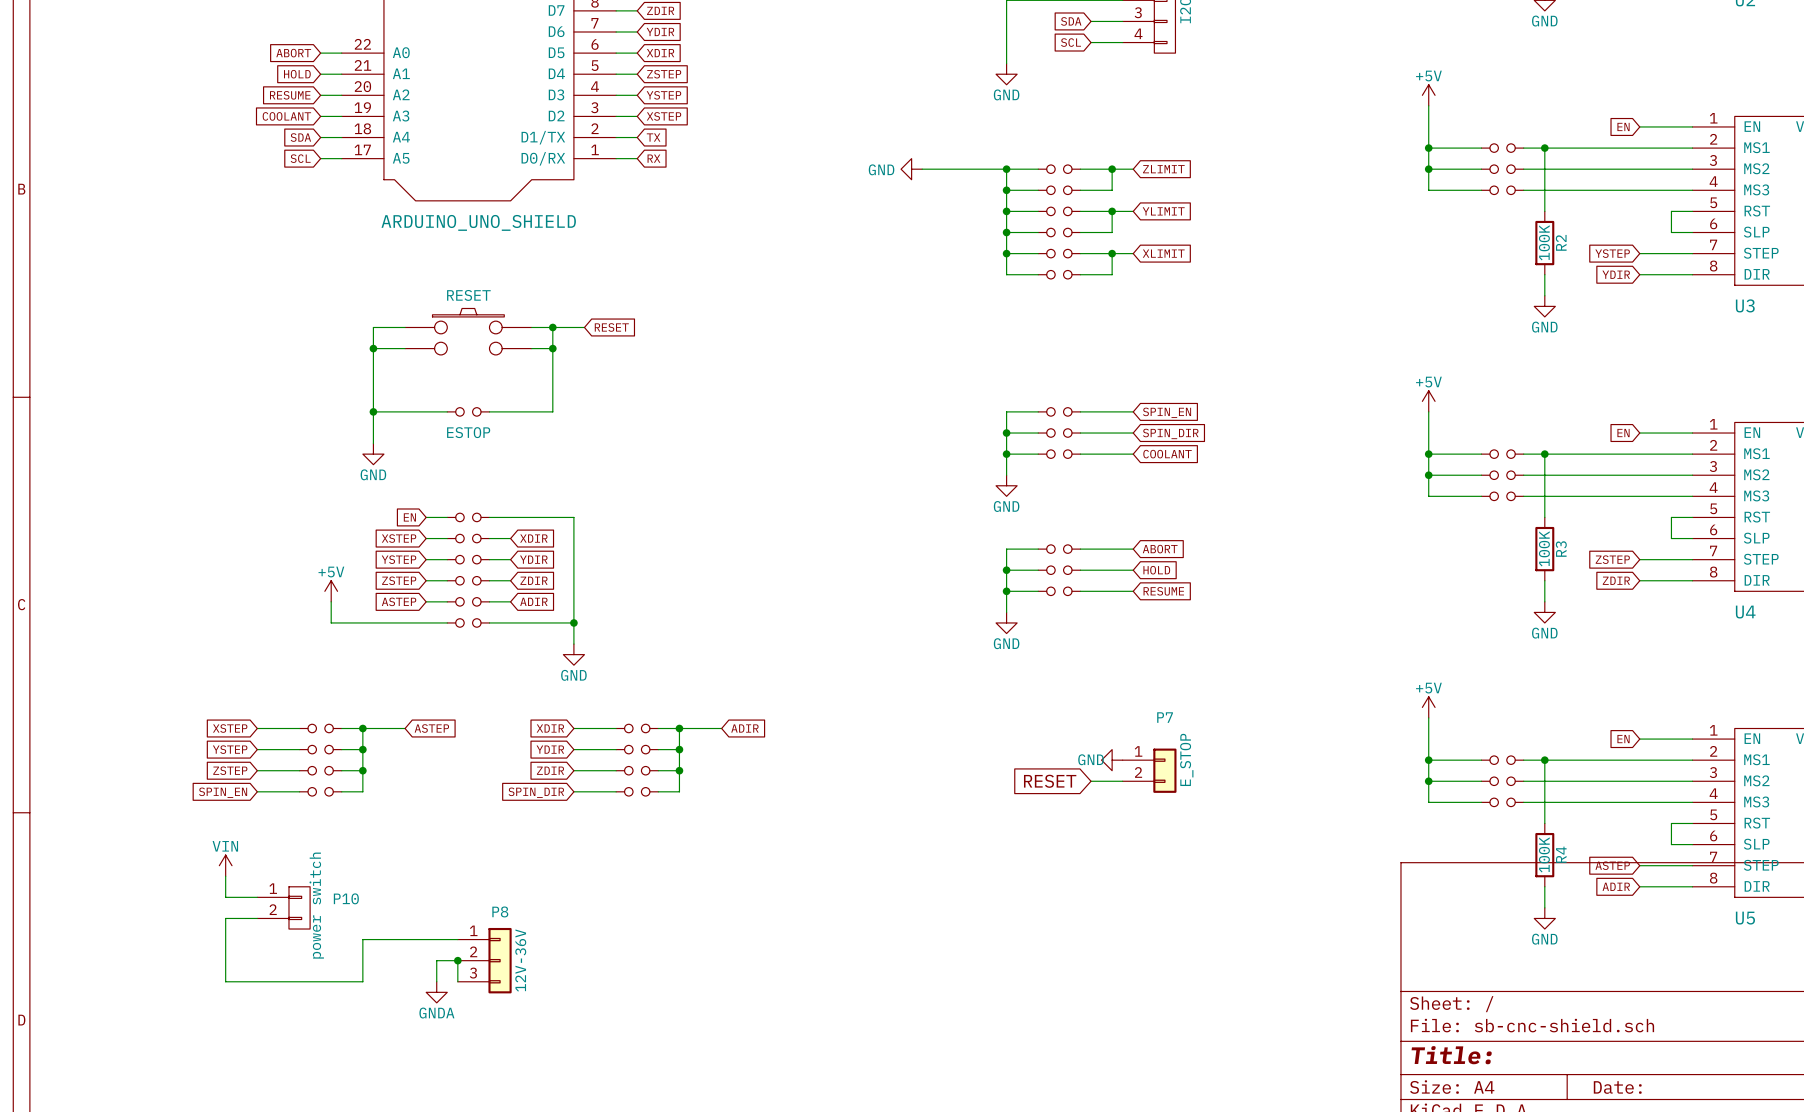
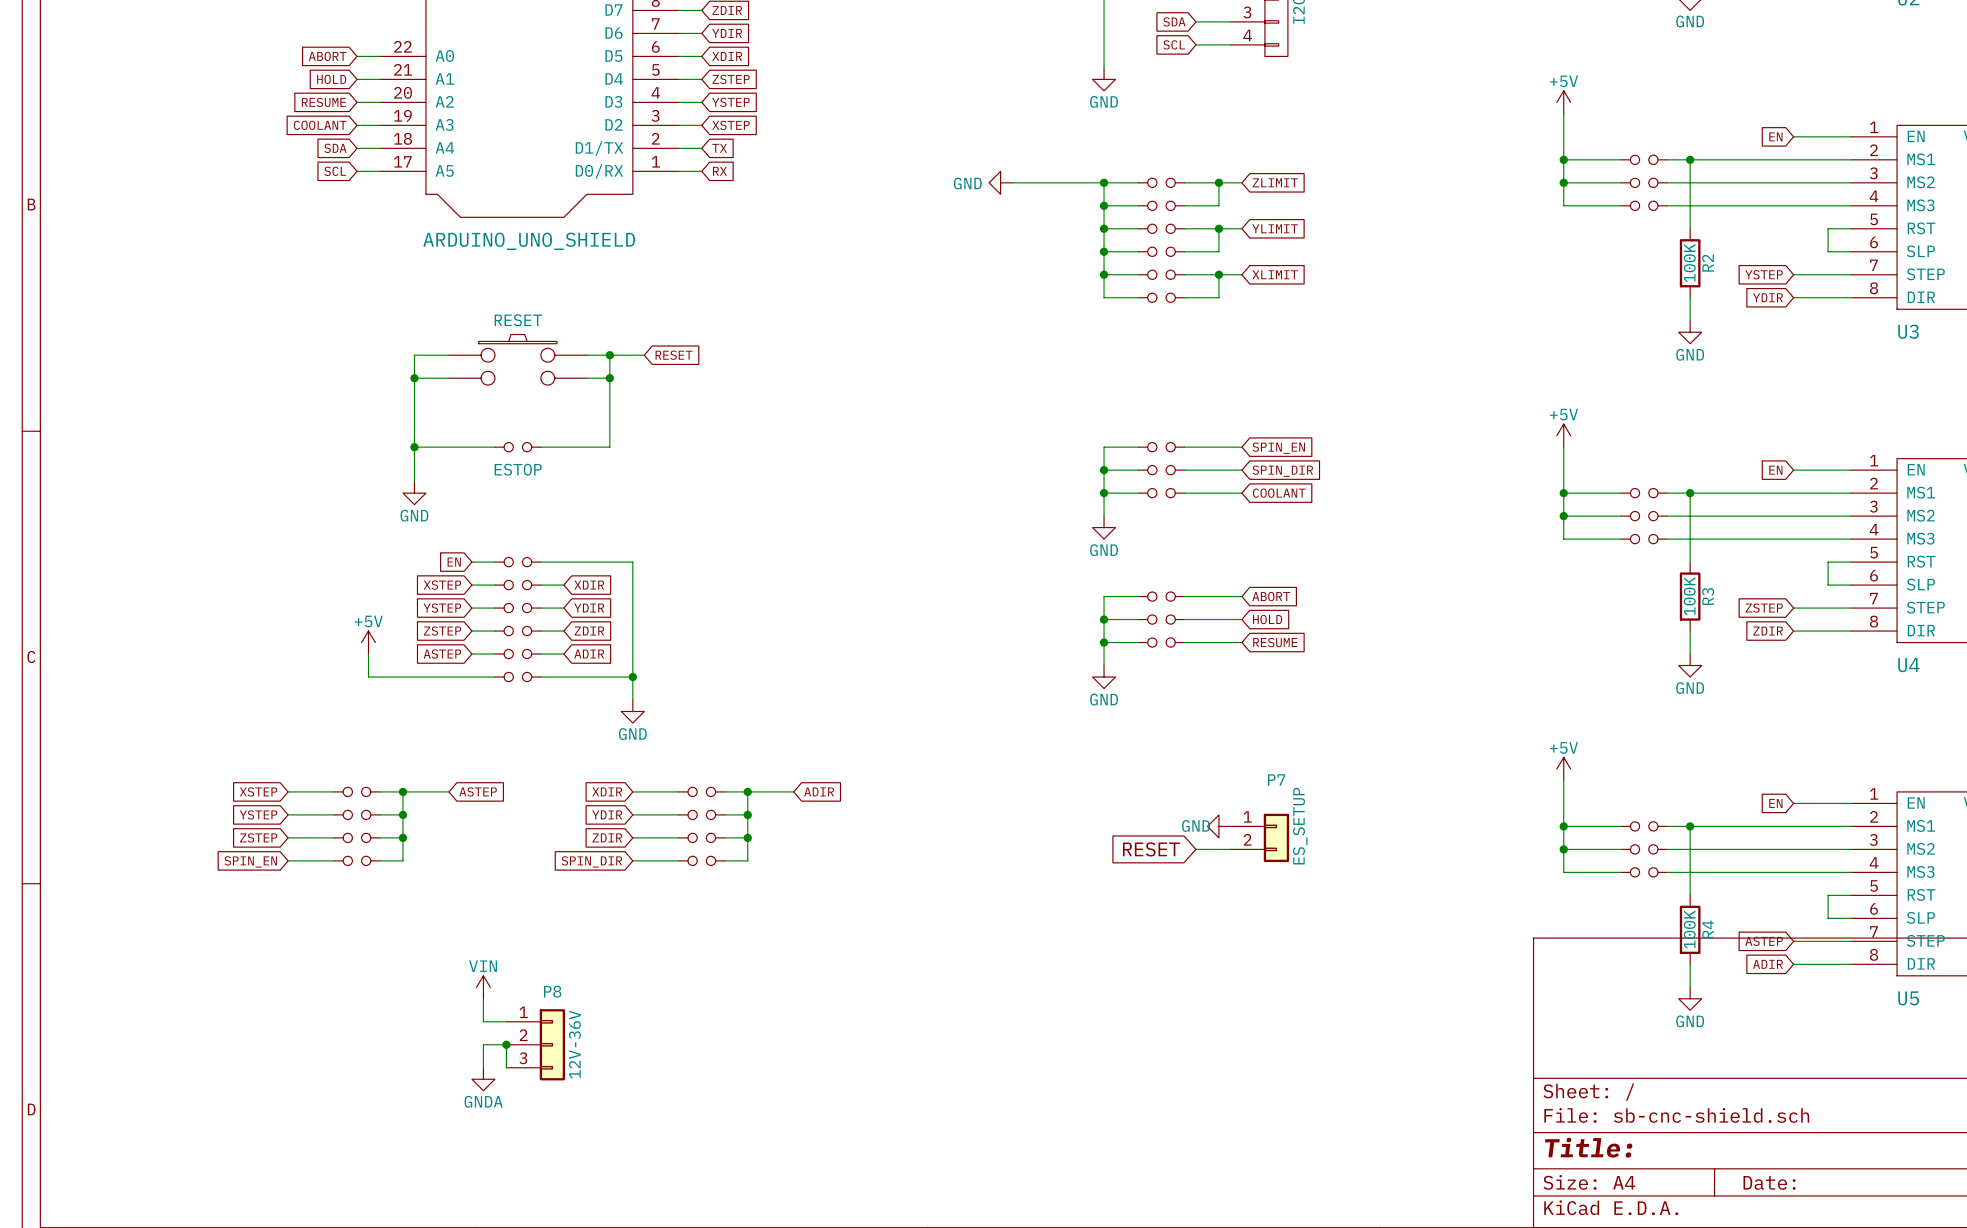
P7 value: E_STOP (1186, 759) -> ES_SETUP (1300, 826)
power symbol: VIN (225, 865) -> none
wire: (225, 876) (225, 897) (257, 897) -> none
P10: power switch (283, 907) -> none
power symbol: none -> VIN (483, 987)
wire: (257, 918) (225, 918) (225, 981) (362, 981) (362, 939) (436, 939) -> (483, 998) (483, 1021)

